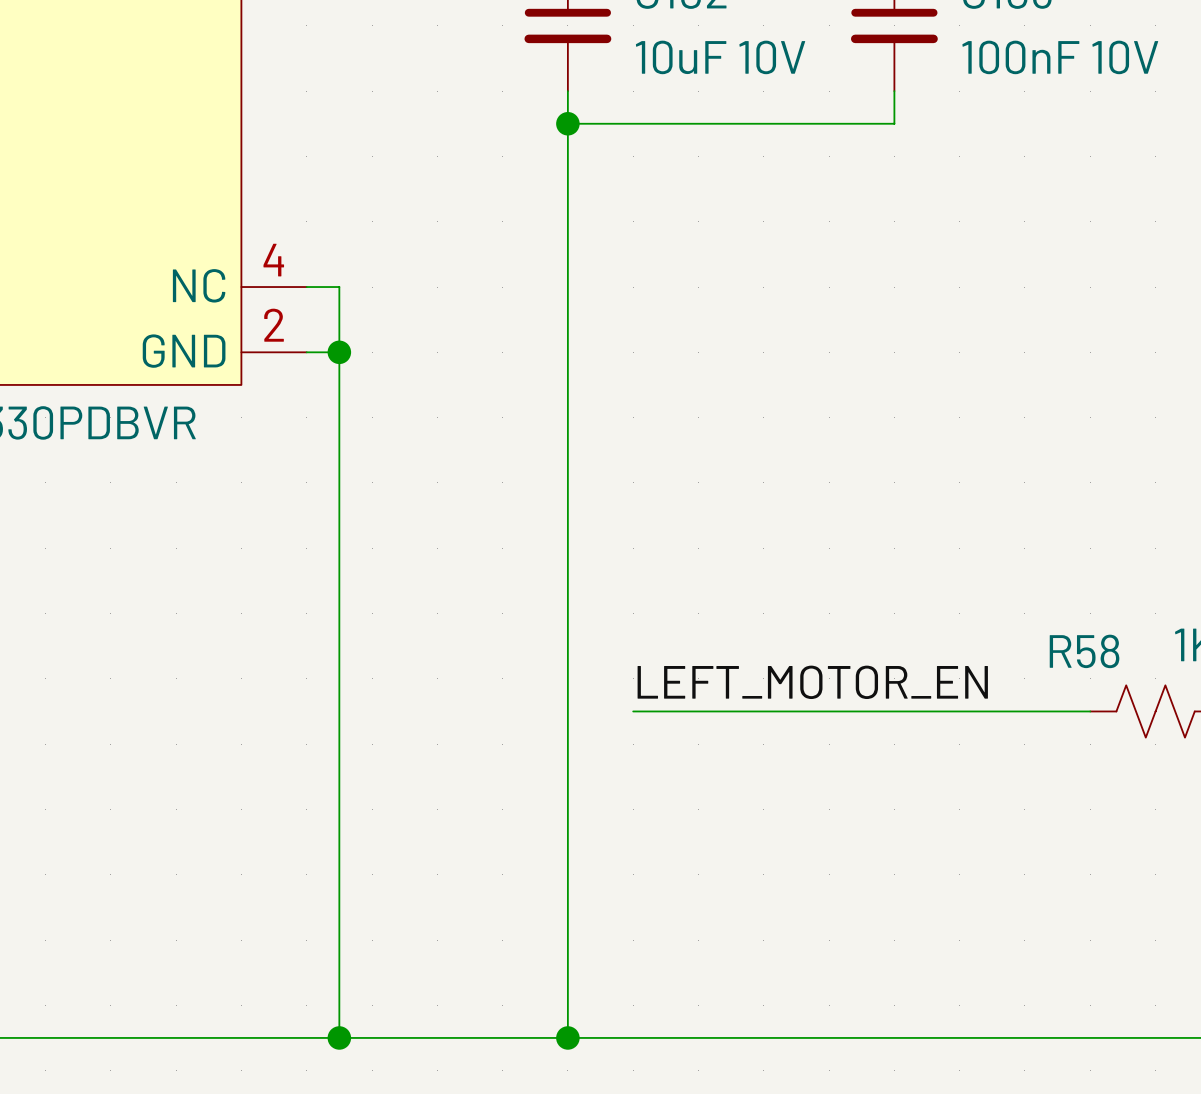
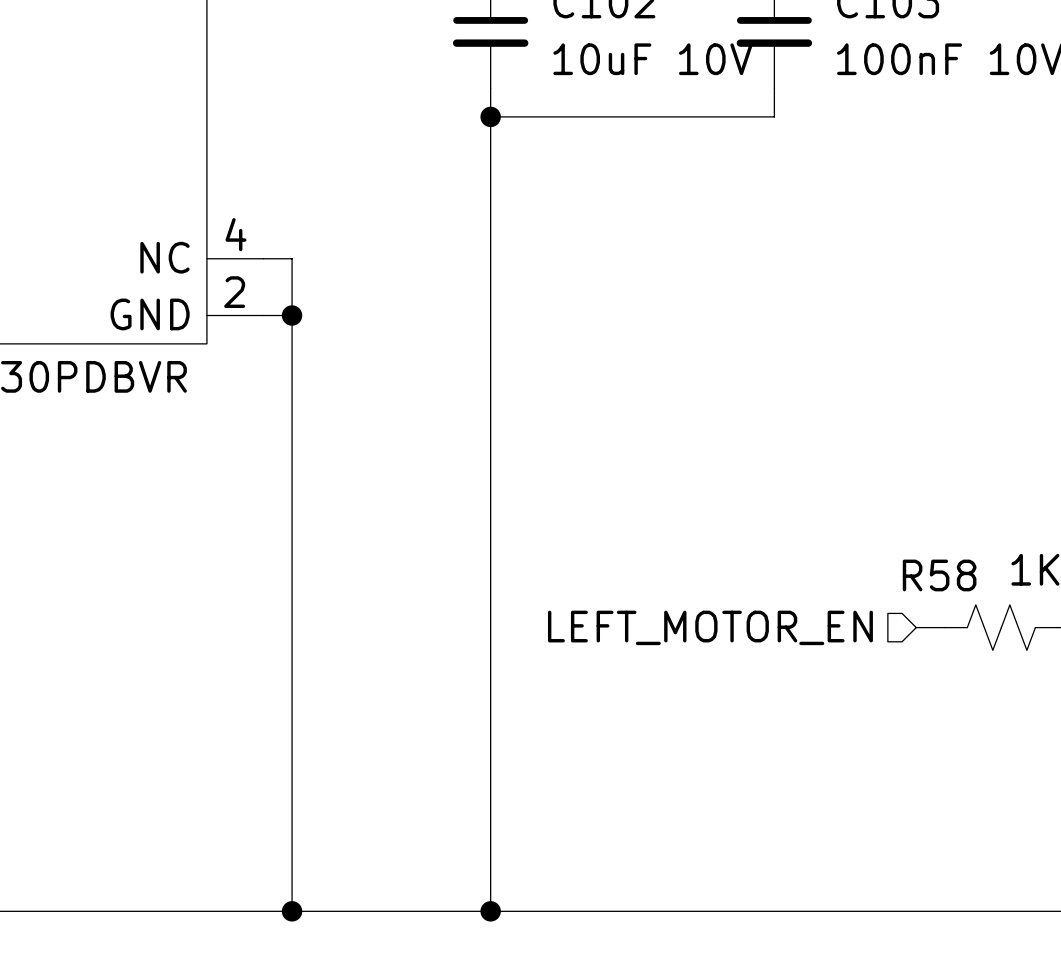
label: LEFT_MOTOR_EN (812, 682) -> none
hierarchical label: none -> LEFT_MOTOR_EN (710, 627)
wire: (633, 711) (1057, 711) -> none

